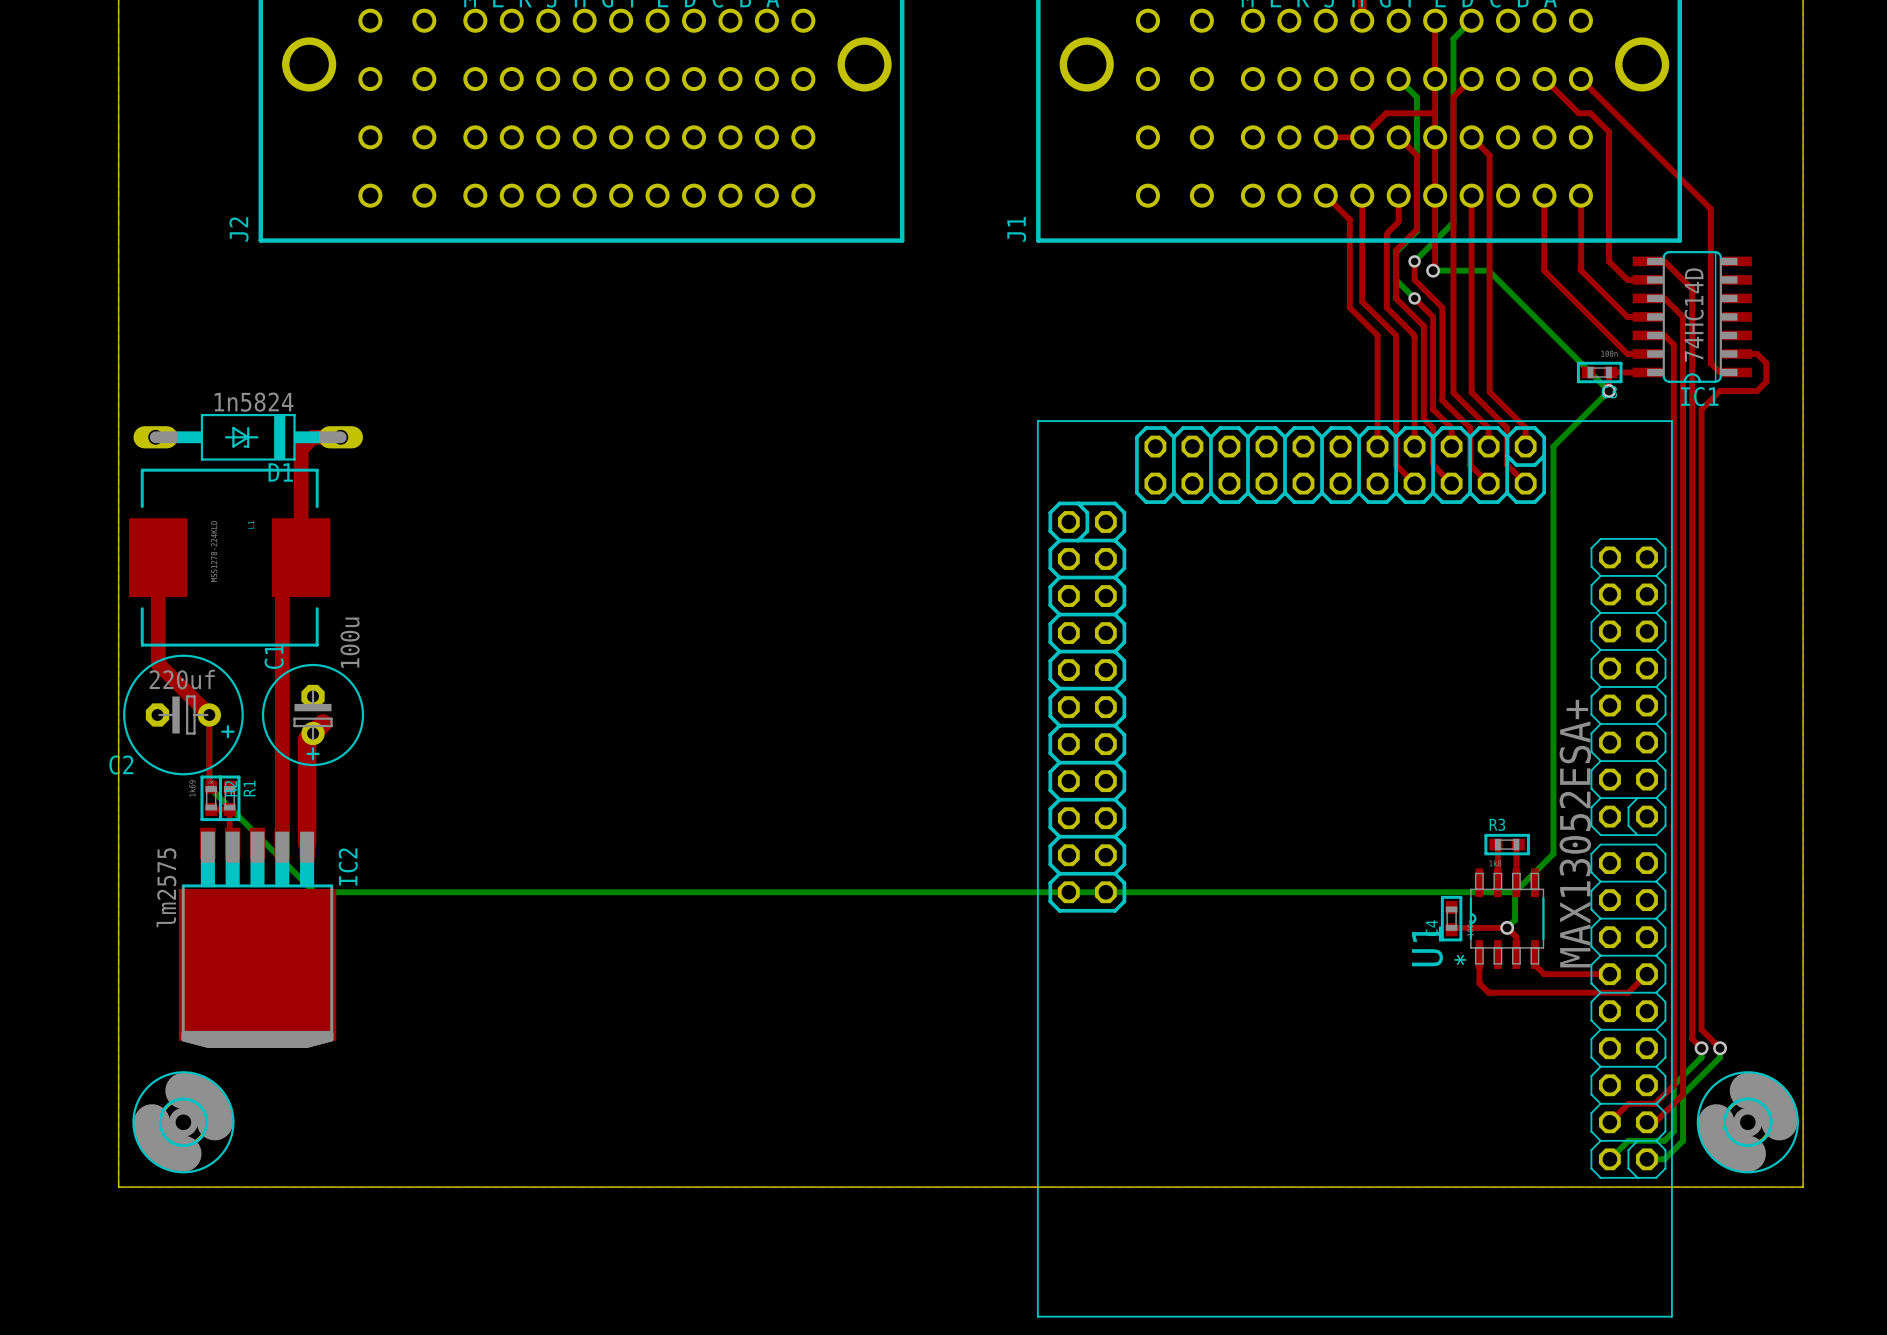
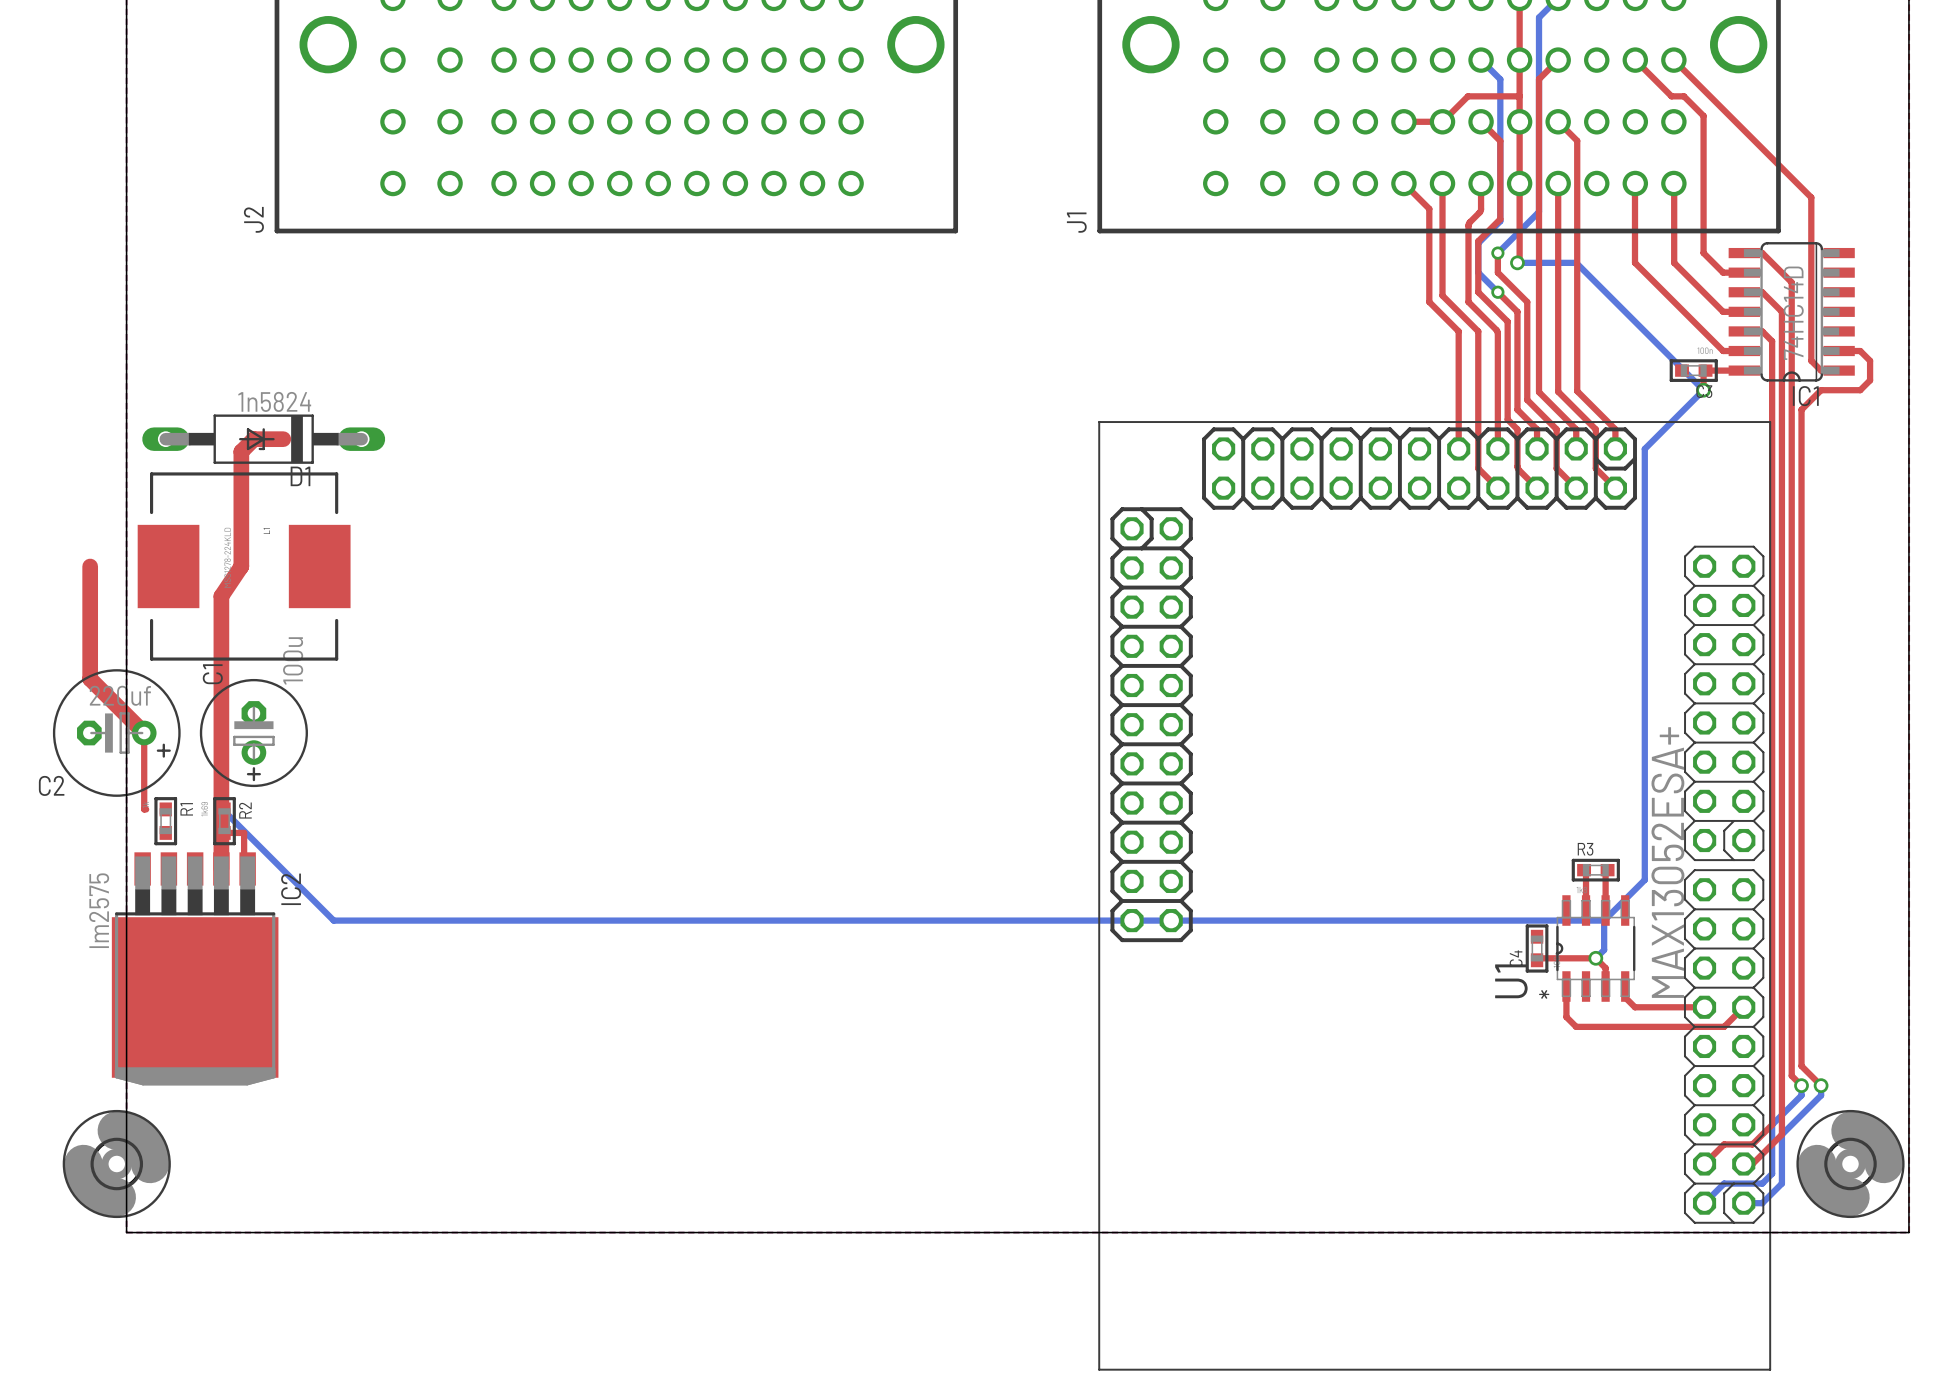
top track: (340, 437) (313, 437) (301, 449) (301, 557) (282, 585) (282, 843) -> (283, 439) (253, 439) (241, 451) (241, 566) (221, 596) (221, 868)
top track: (158, 557) (158, 663) (209, 714) (209, 787) (211, 787) -> (90, 566) (90, 678) (144, 733) (144, 809) (146, 809)
C2 position: (183, 714) -> (116, 733)
C1 position: (313, 714) -> (253, 733)
top track: (323, 723) (307, 739) (307, 843) -> none
R1 position: (229, 798) -> (165, 821)
IC2 position: (257, 937) -> (195, 968)
part position: (183, 1122) -> (116, 1163)

